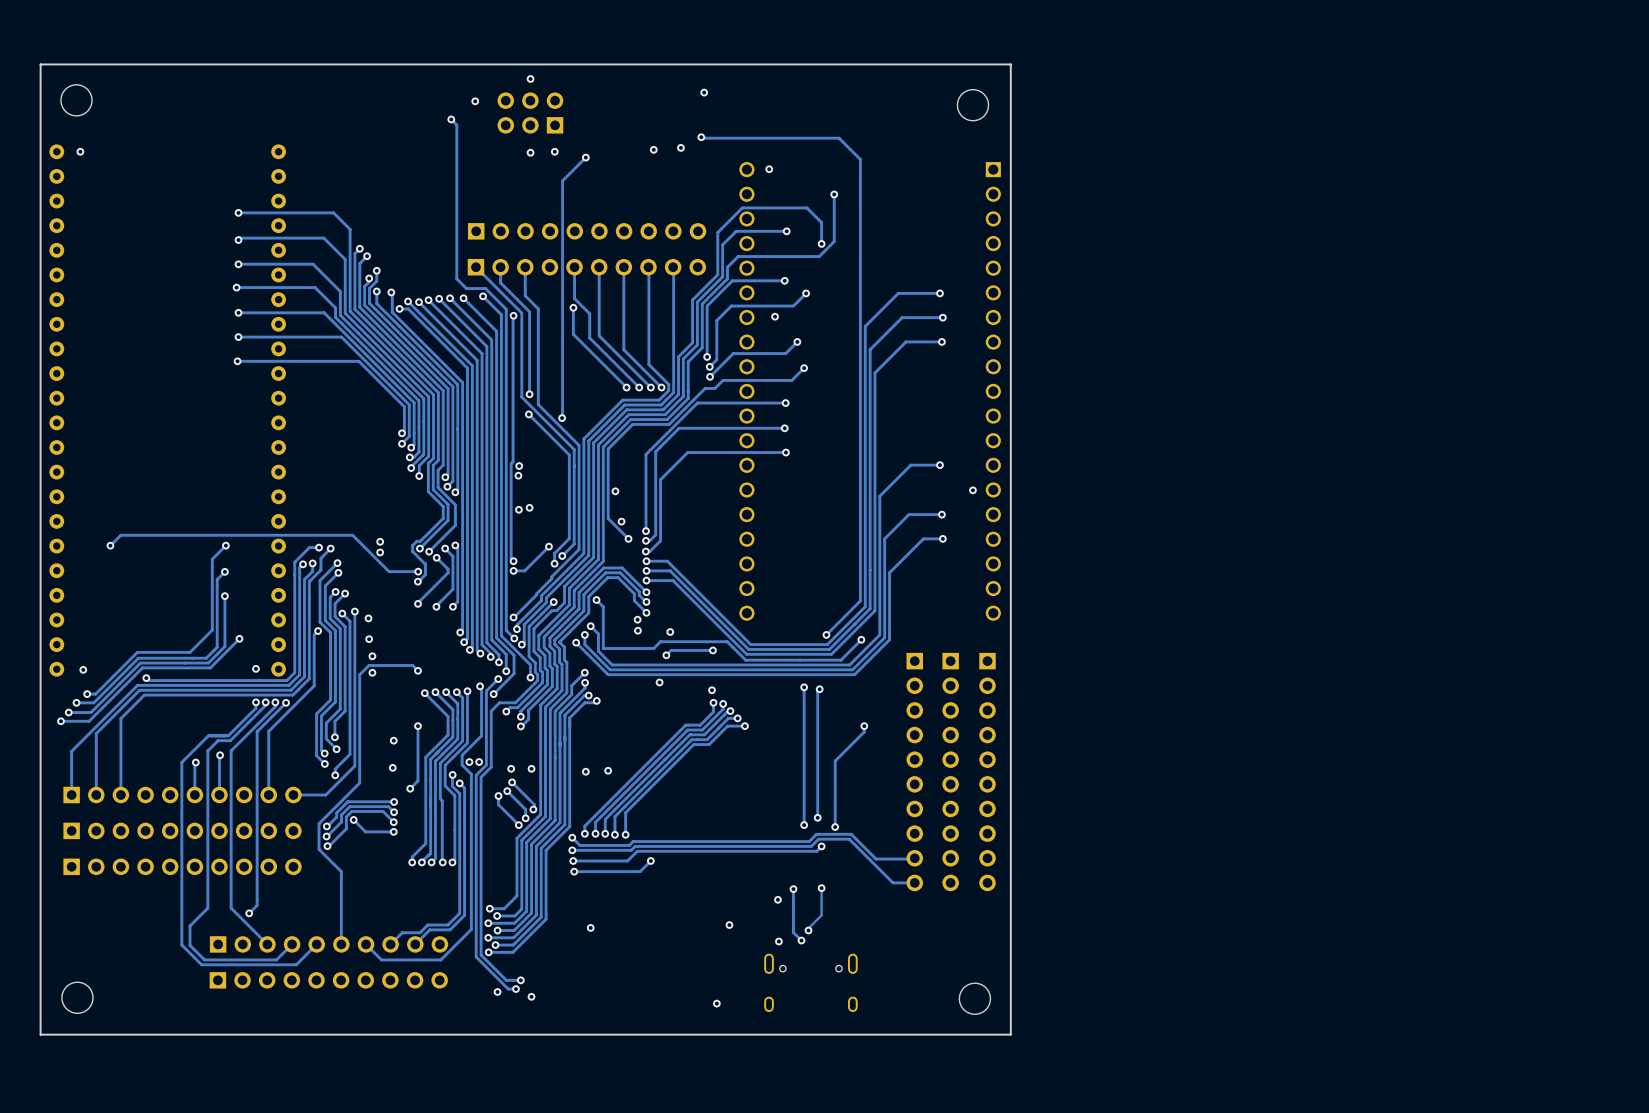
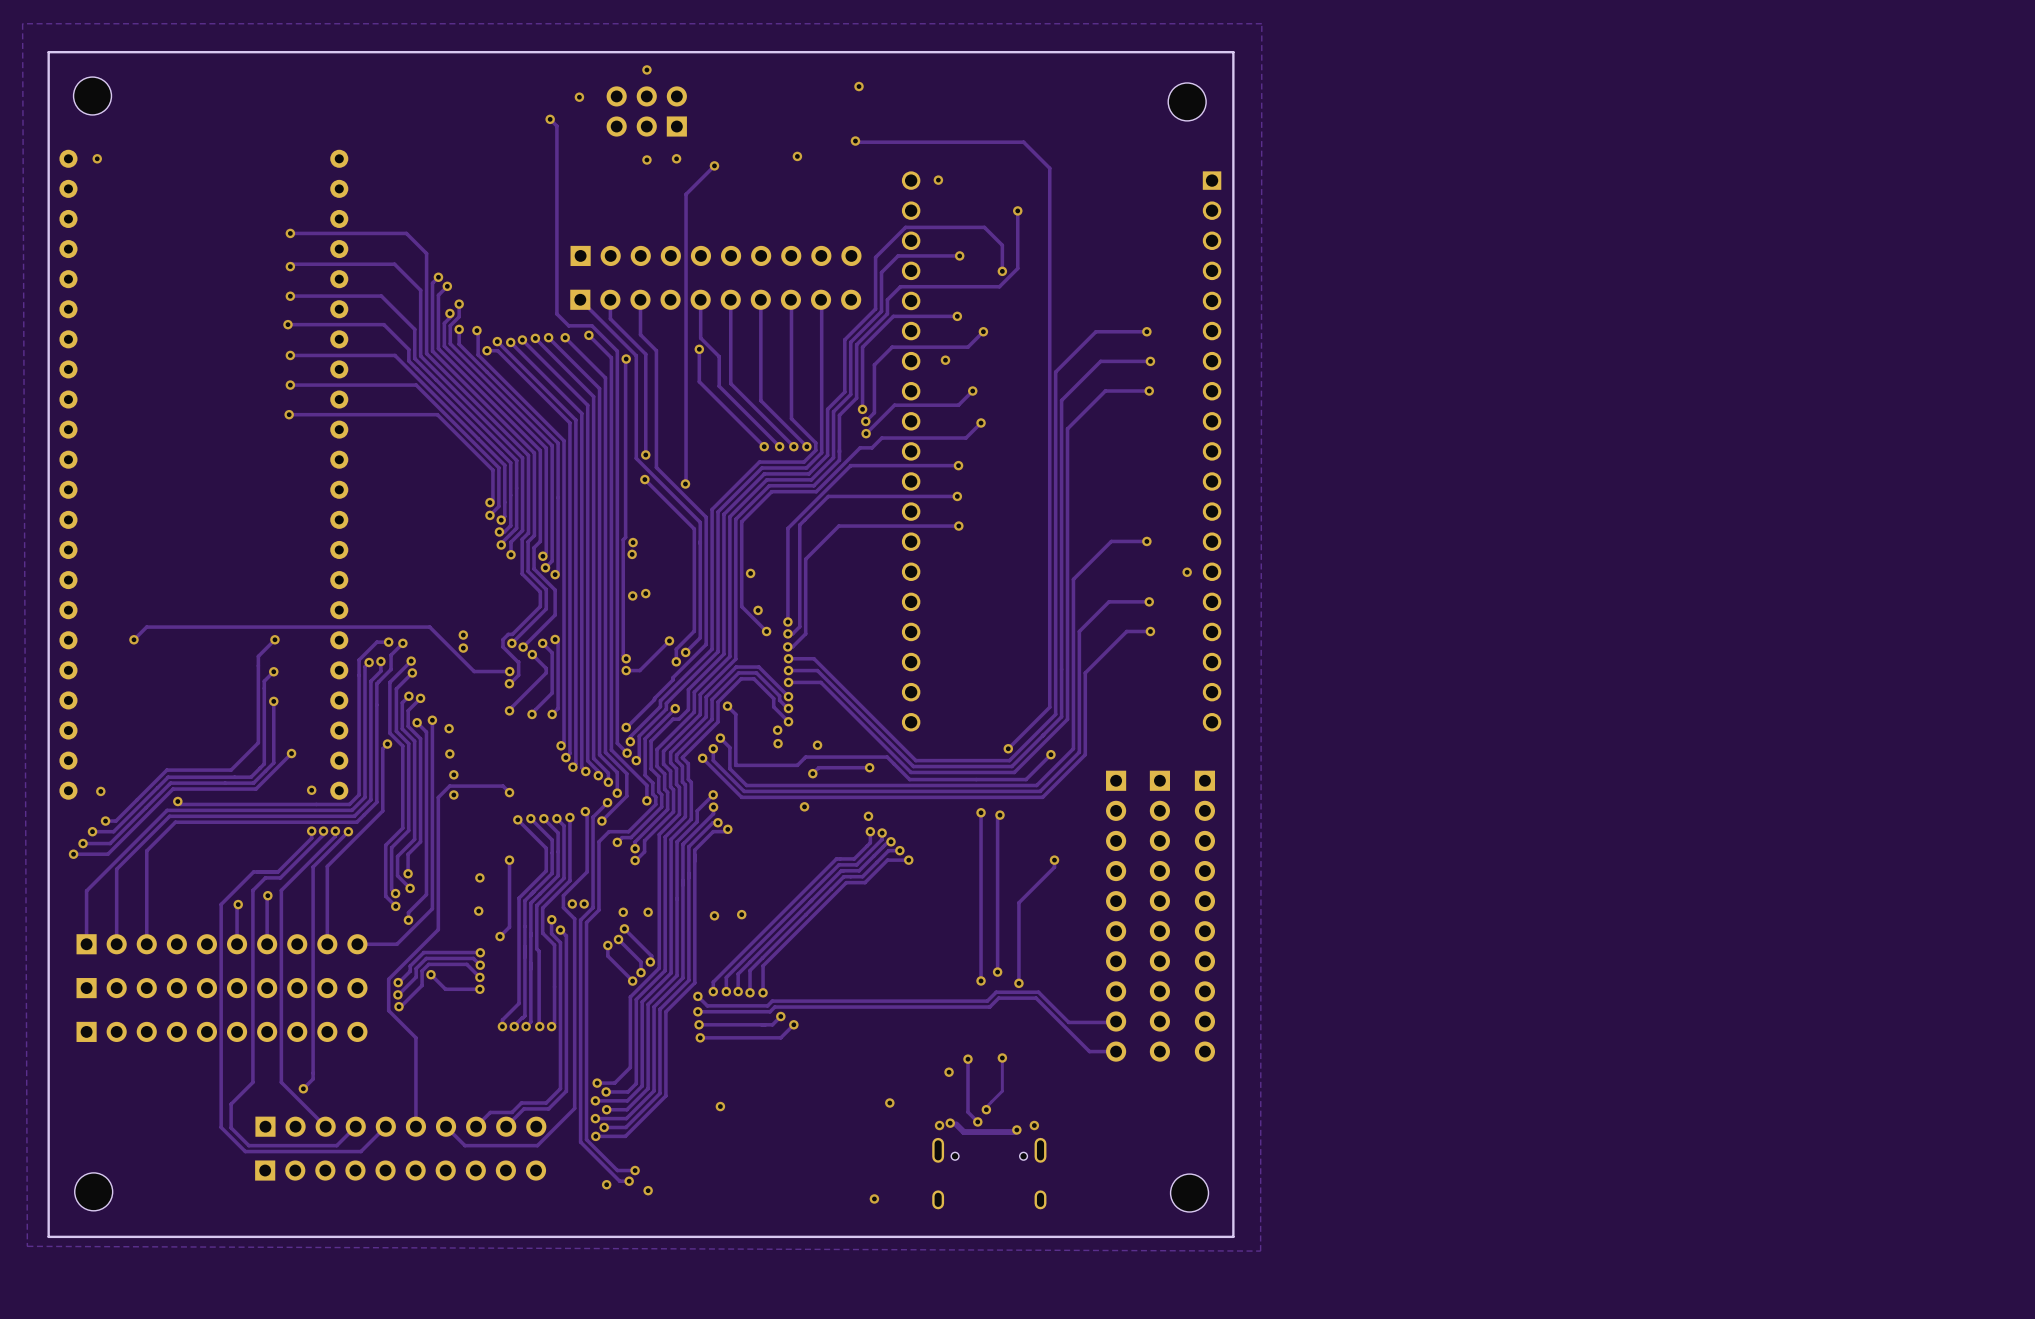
zone outline: none -> (1261, 23) (1260, 1251) (27, 1246) (22, 23) (1261, 23)
via: (680, 147) -> none
track: (821, 846) (816, 851) (637, 851) (627, 860) -> (780, 1016) (772, 1024) (765, 1024)
via: (821, 846) -> none
via: none -> (780, 1016)
track: none -> (956, 1124) (963, 1132) (1014, 1132) (1016, 1129)
via: none -> (939, 1125)
via: none -> (1034, 1125)
via: none -> (1016, 1129)

